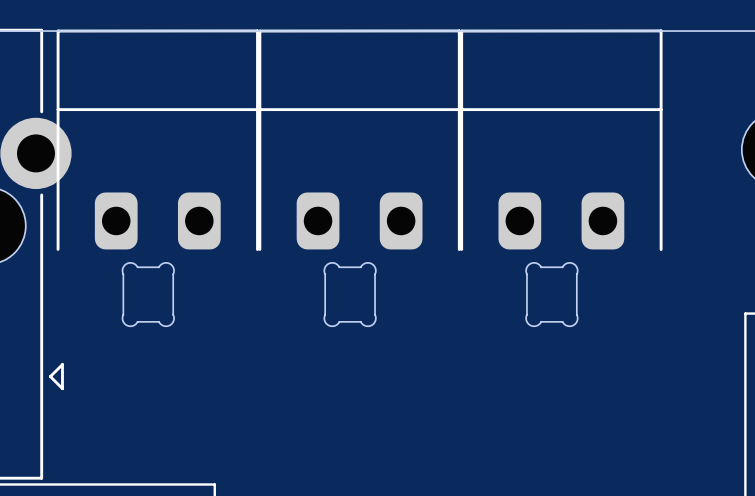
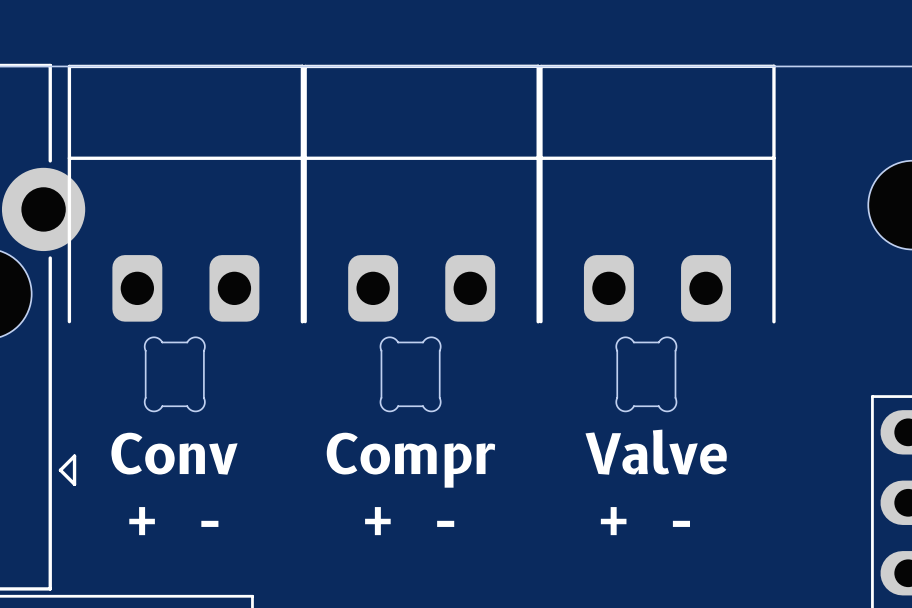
text: none -> Valve (656, 452)
text: none -> Conv (174, 453)
text: none -> Compr (410, 460)
text: none -> + - (173, 521)
text: none -> + - (409, 521)
text: none -> + - (645, 521)

